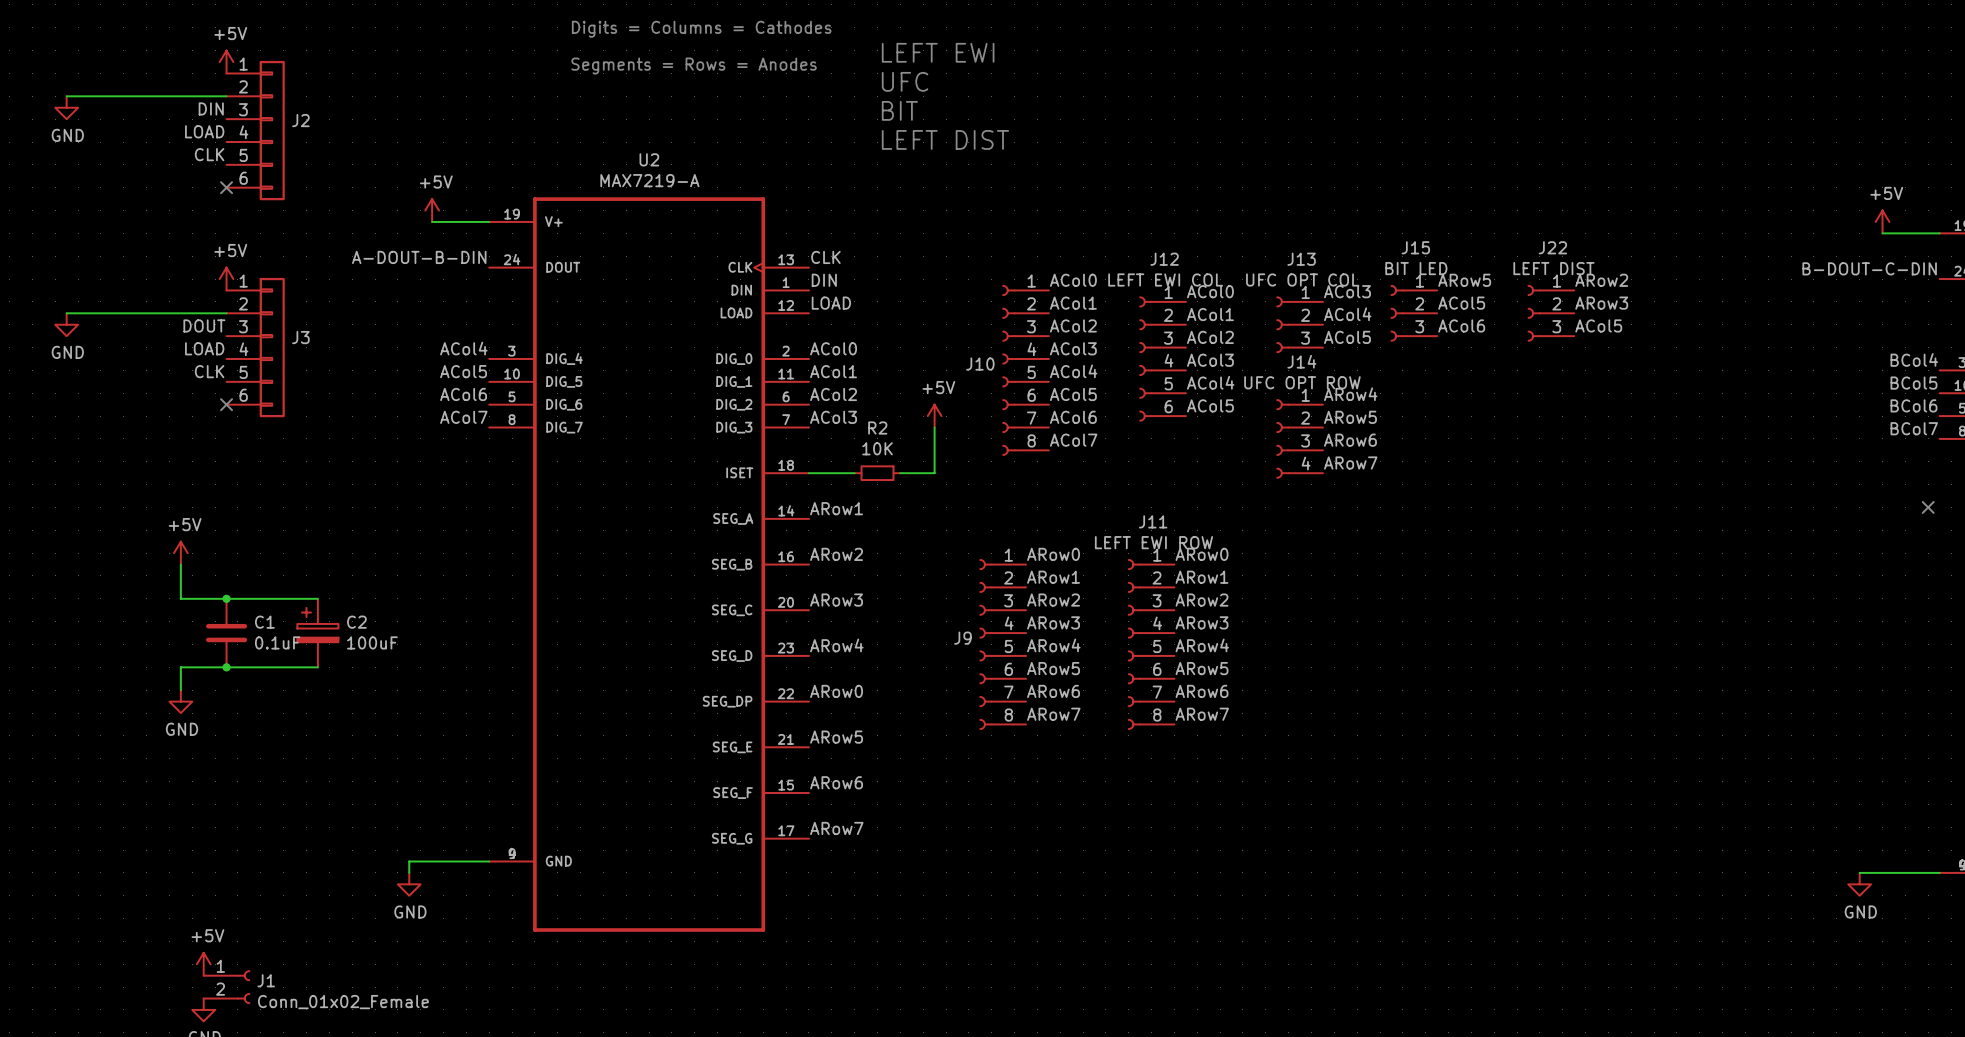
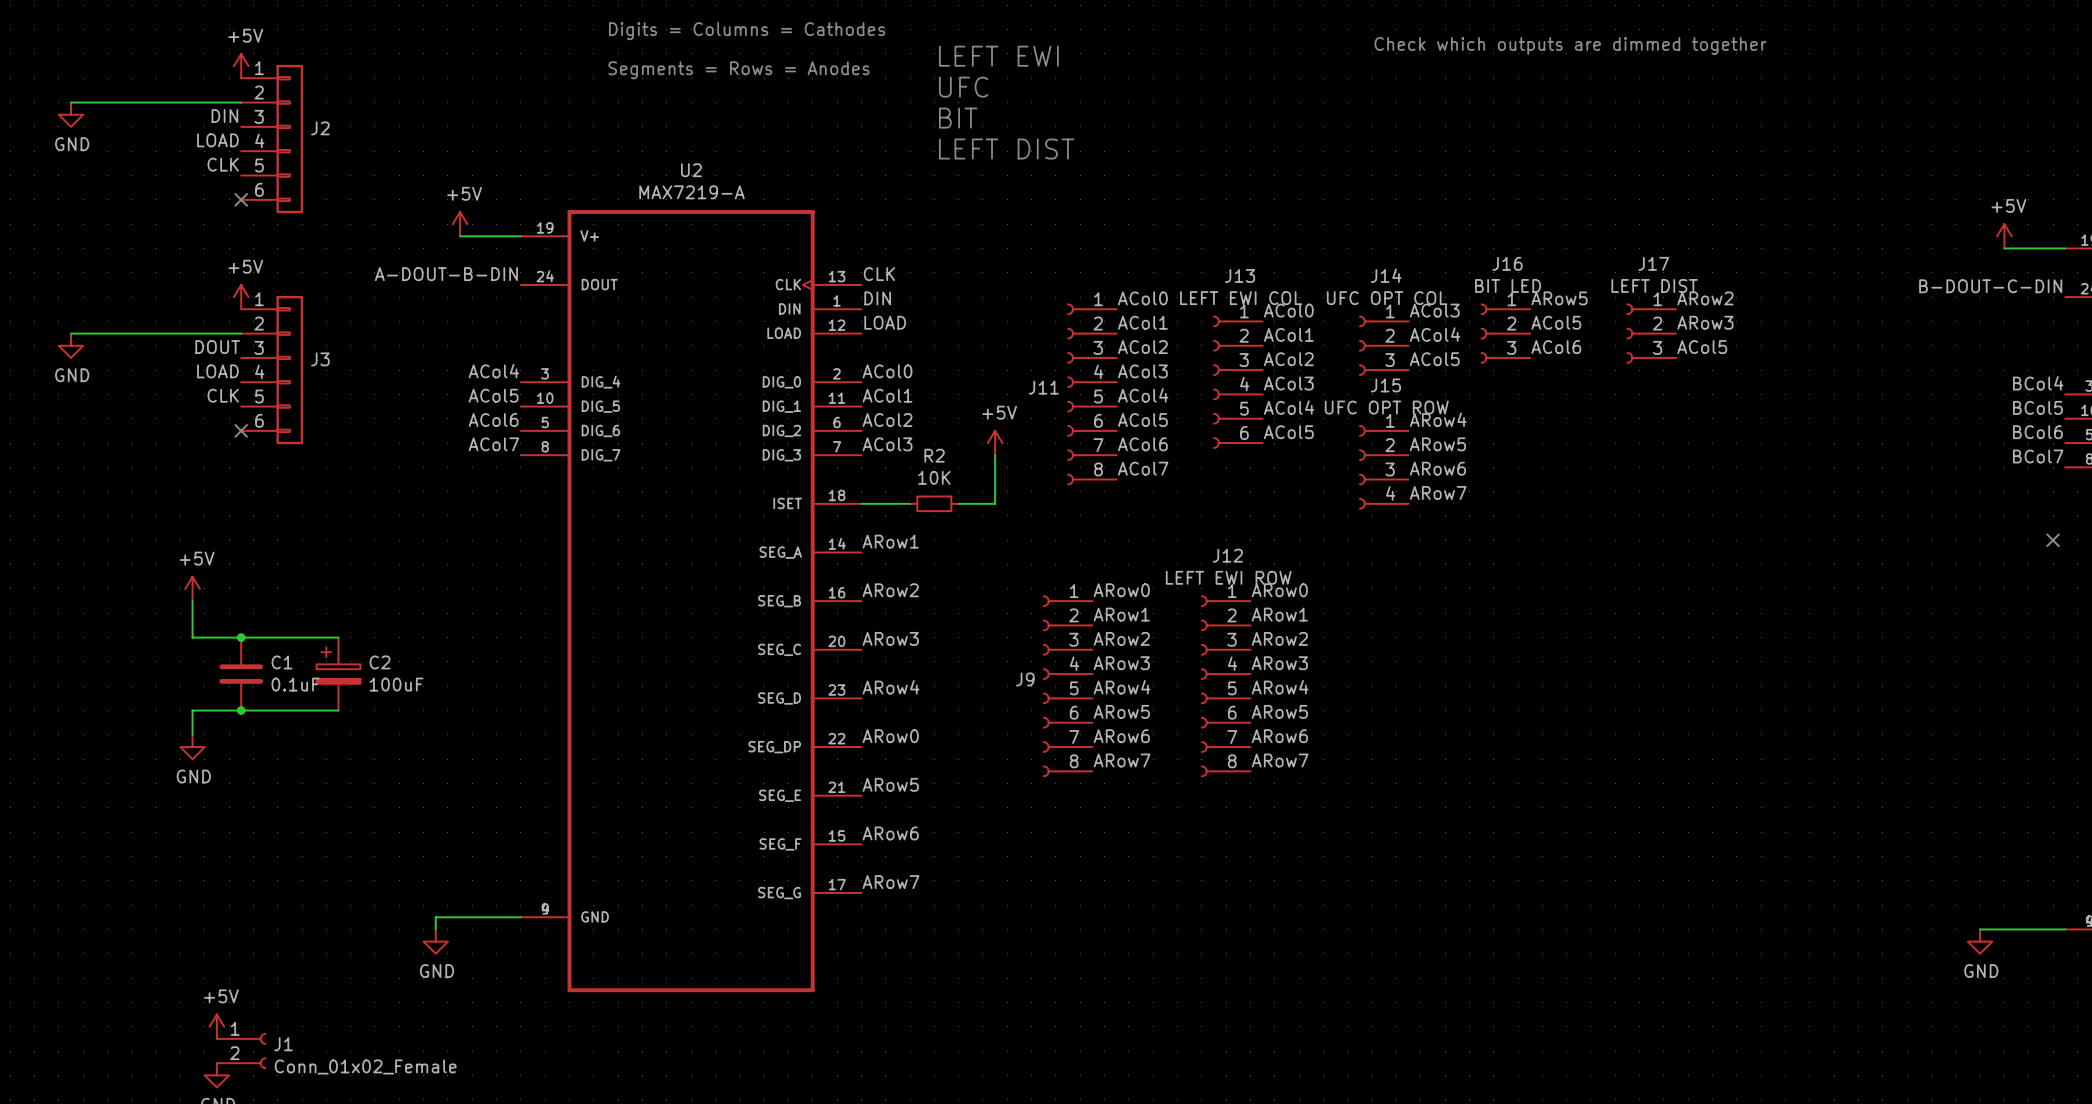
text: none -> Check which outputs are dimmed together (1570, 45)
J15 name: J15 (1415, 247) -> J16 (1507, 263)
J22 name: J22 (1552, 247) -> J17 (1653, 263)
J12 name: J12 (1164, 259) -> J13 (1239, 275)
J13 name: J13 (1301, 259) -> J14 (1386, 275)
J14 name: J14 (1301, 361) -> J15 (1385, 385)
J10 name: J10 (980, 364) -> J11 (1043, 387)
J11 name: J11 (1153, 521) -> J12 (1227, 555)

